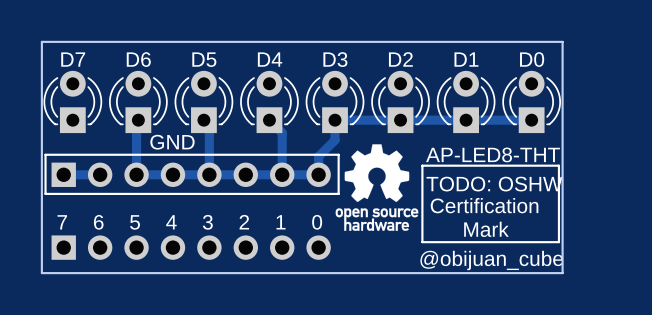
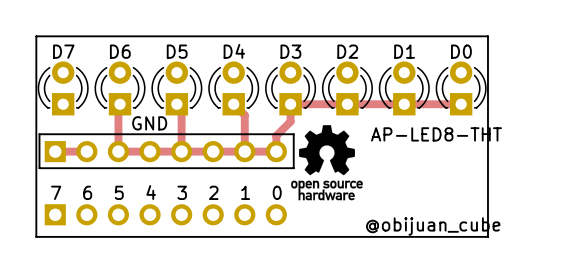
line: (422, 165) (558, 165) (558, 242) (422, 242) (422, 165) -> none
text: TODO: OSHW (494, 184) -> none
text: Certification (484, 205) -> none
text: Mark (486, 229) -> none

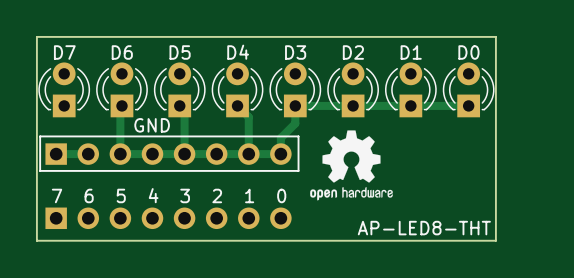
drawing: [291, 125, 363, 201] -> none
drawing: none -> [310, 130, 393, 201]
text position: AP-LED8-THT (436, 134) -> AP-LED8-THT (424, 228)
text: @obijuan_cube (433, 226) -> none

